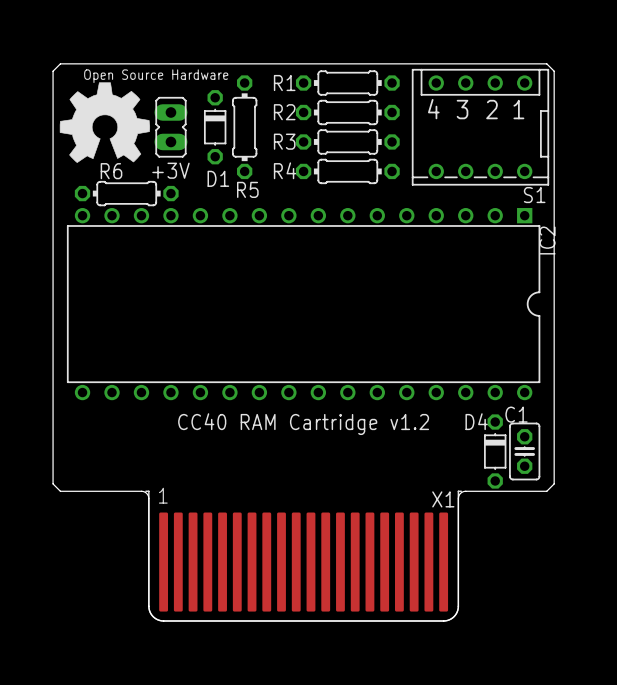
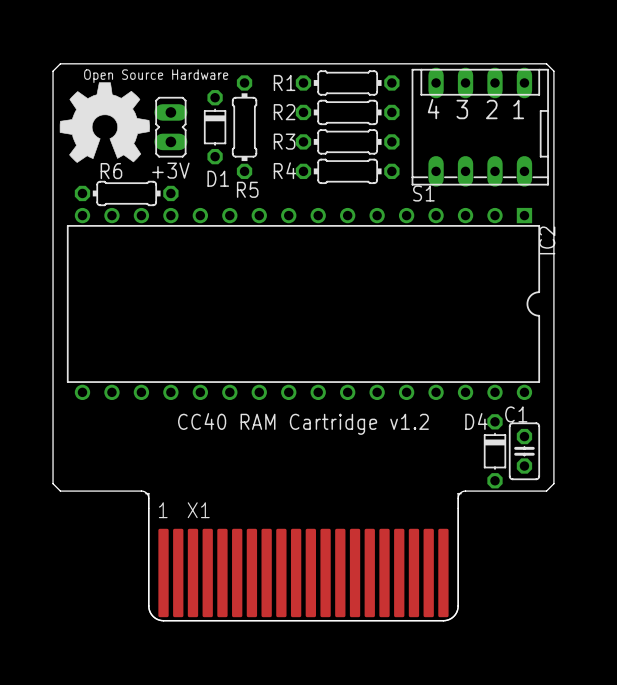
S1 footprint: [411, 68, 550, 186] -> [411, 67, 549, 187]
S1 name position: S1 (534, 195) -> S1 (423, 193)
X1 footprint: [145, 490, 463, 622] -> [145, 492, 462, 622]
X1 name position: X1 (443, 499) -> X1 (198, 510)

